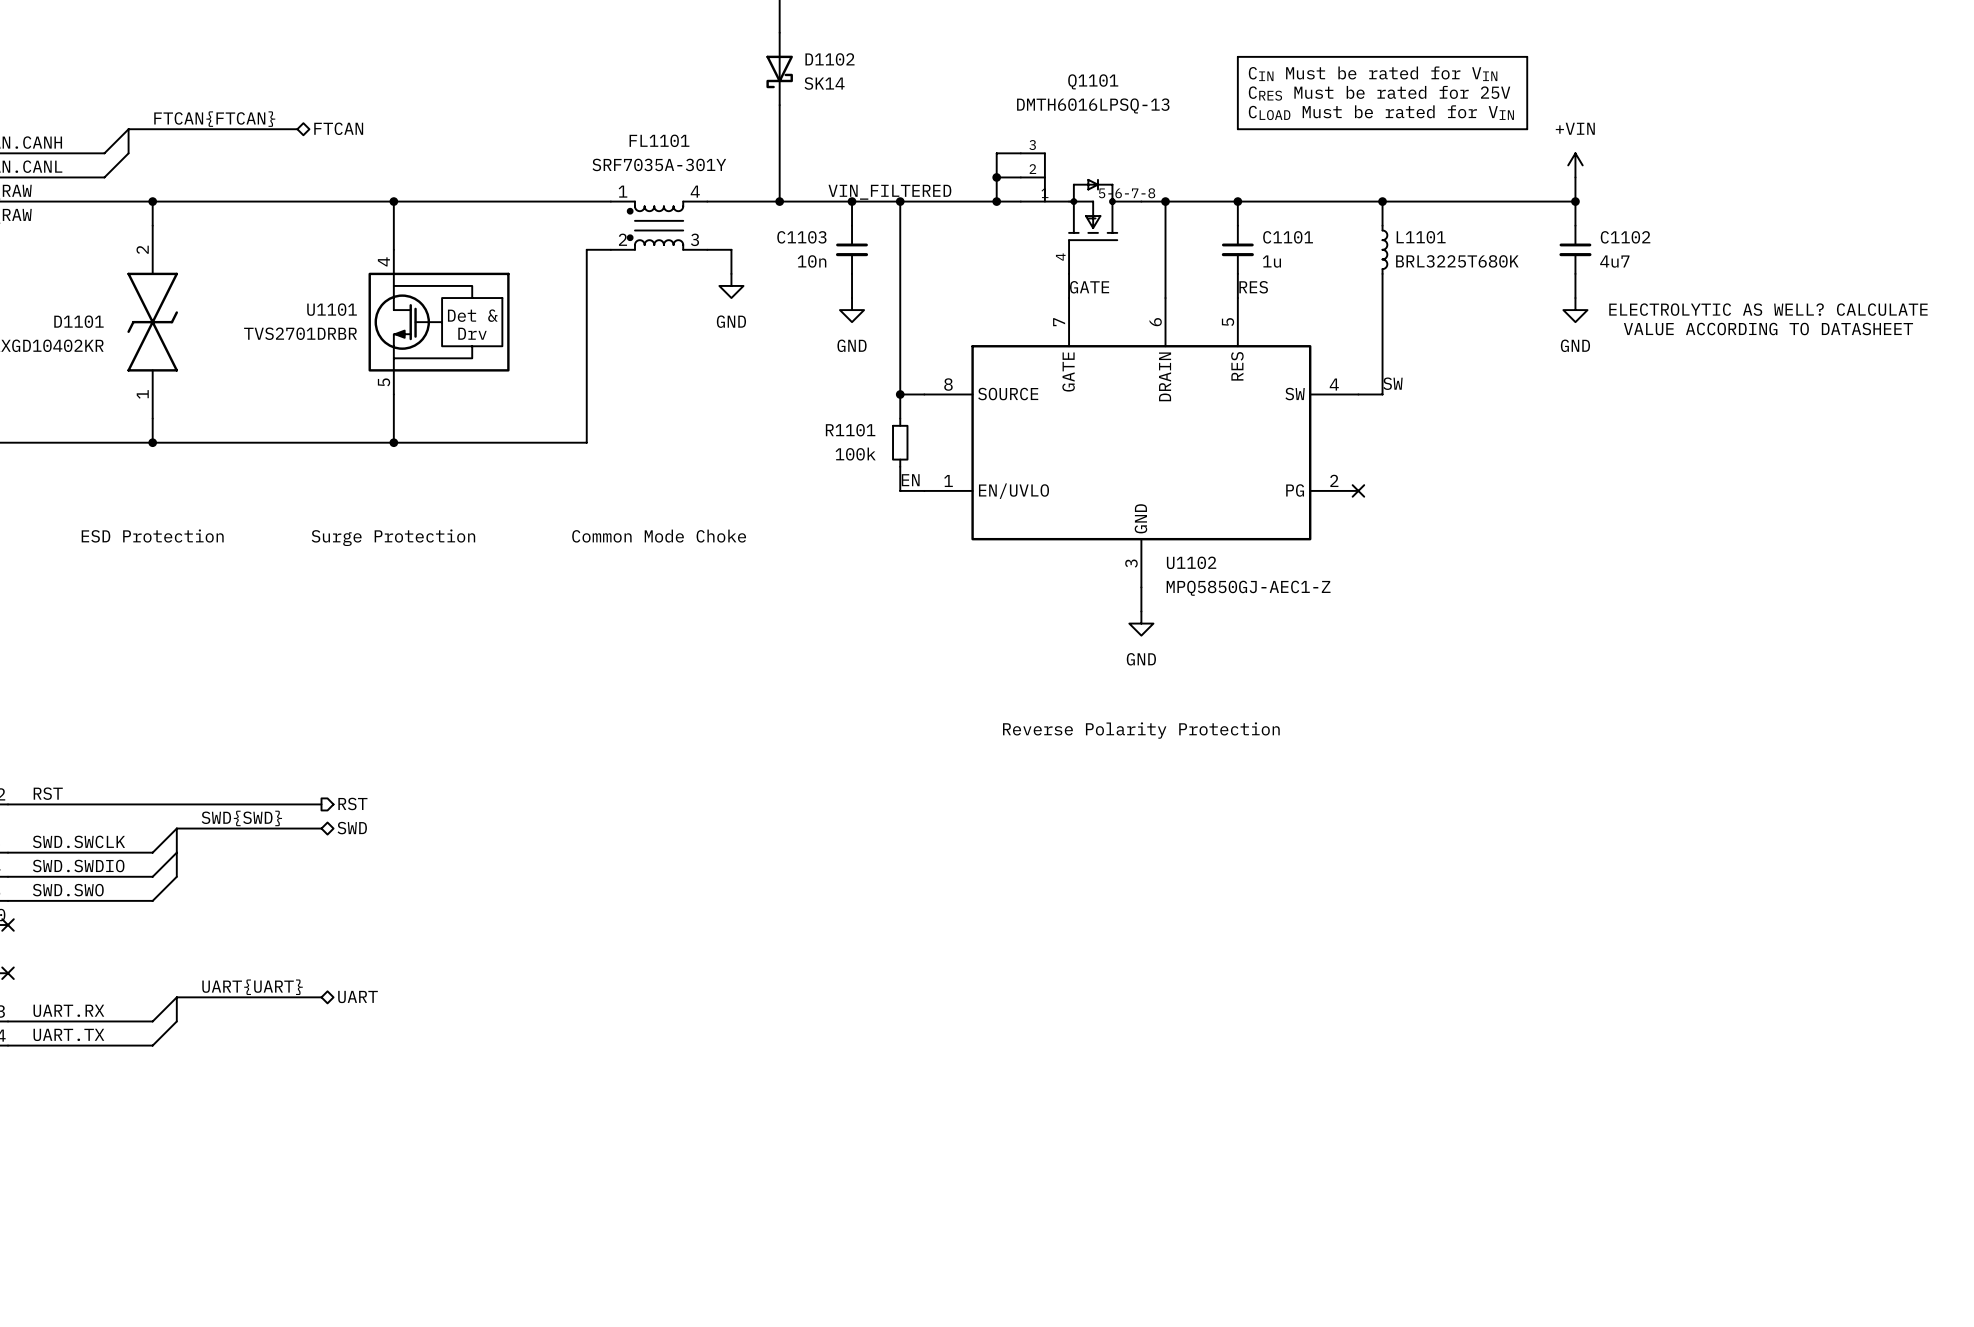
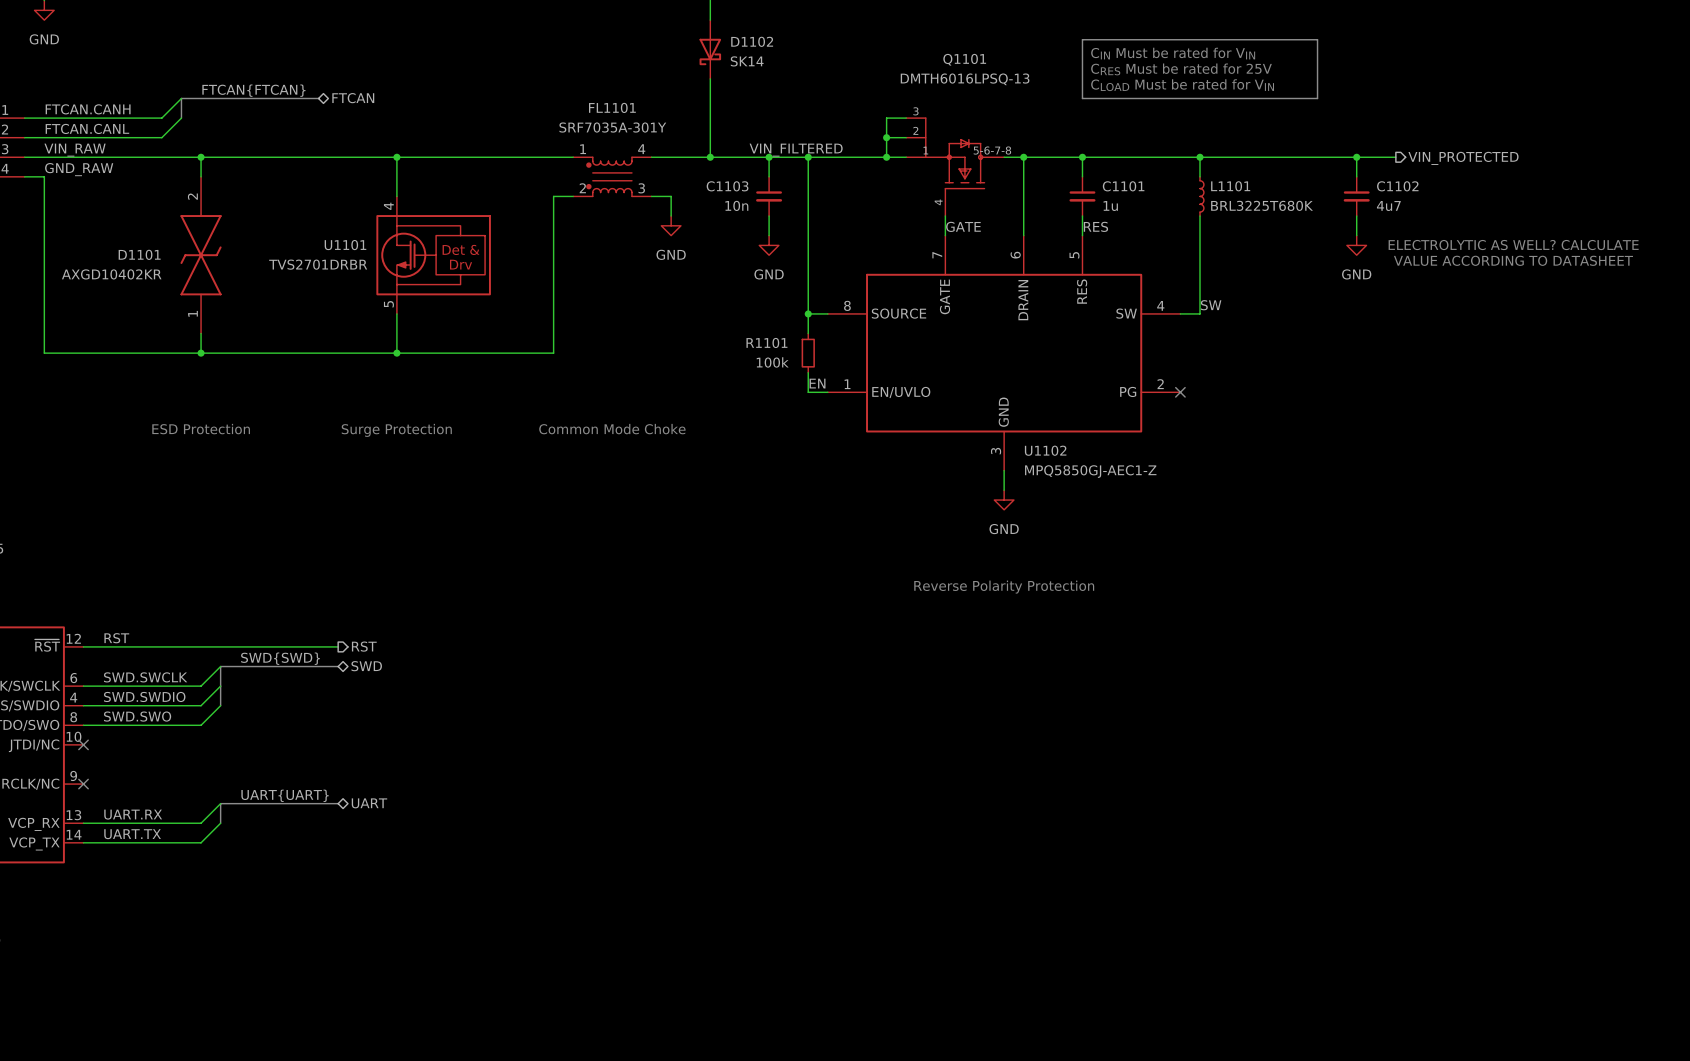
power symbol: +VIN (1575, 165) -> none
wire: (1575, 177) (1575, 201) -> (1395, 157) (1356, 157)
hierarchical label: none -> VIN_PROTECTED (1463, 158)

